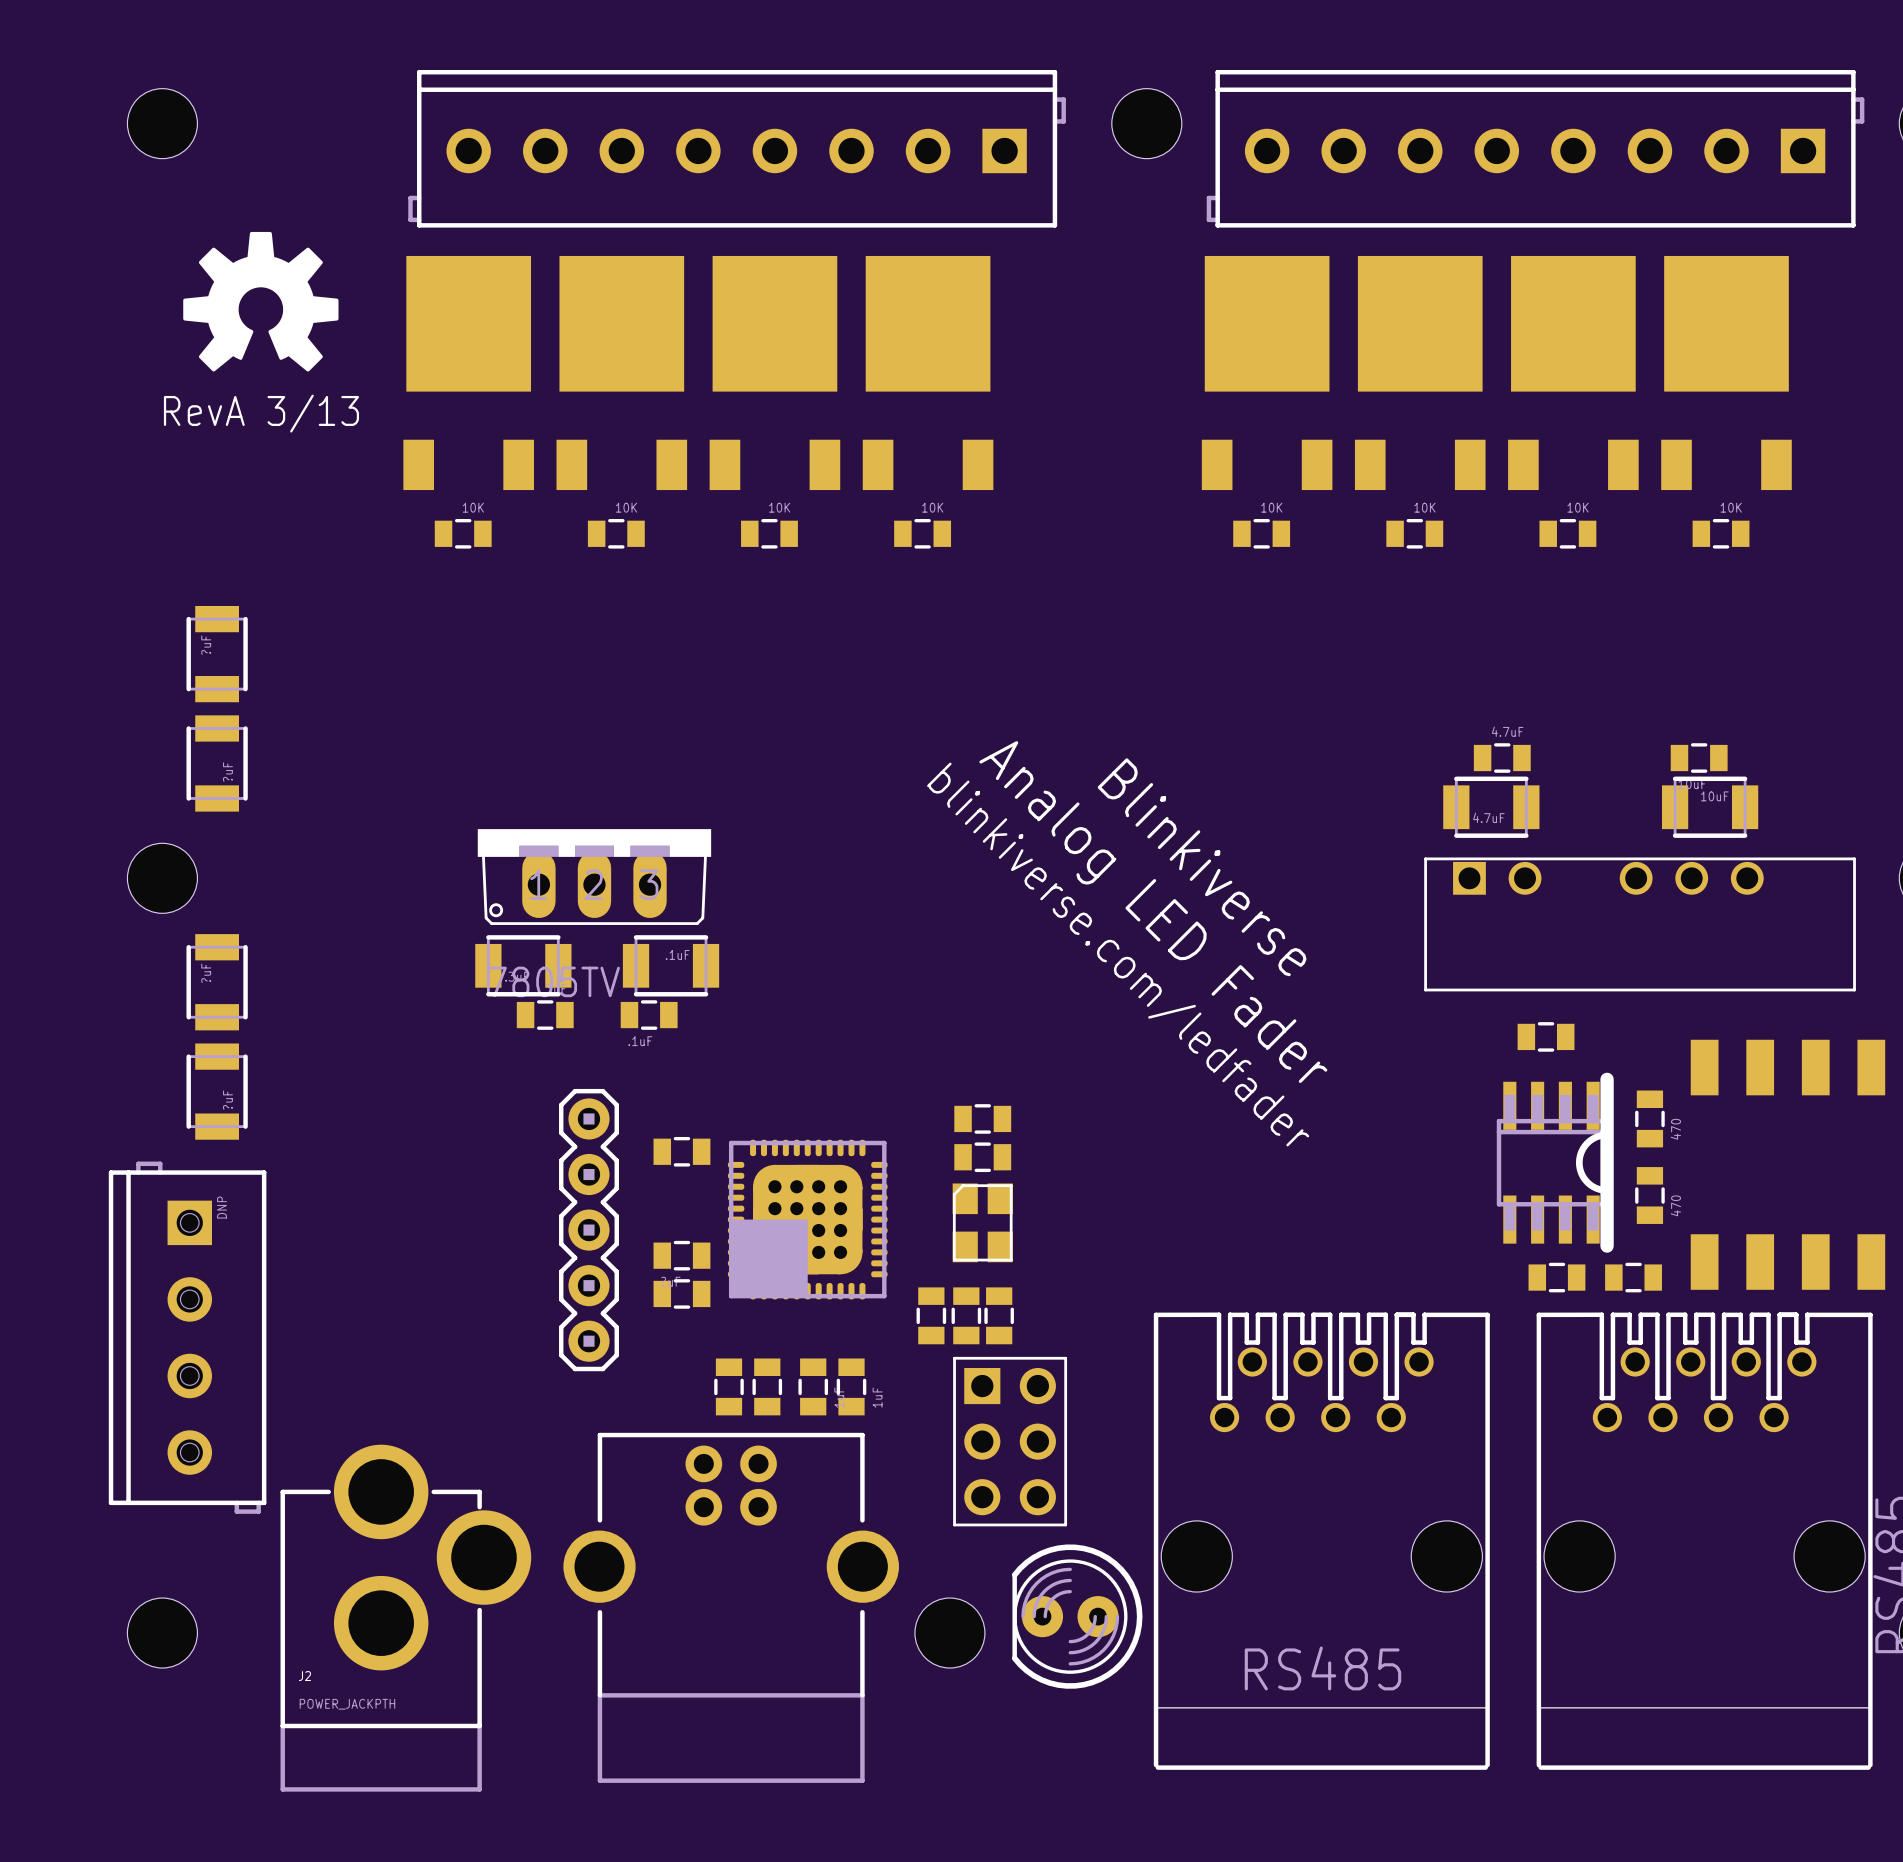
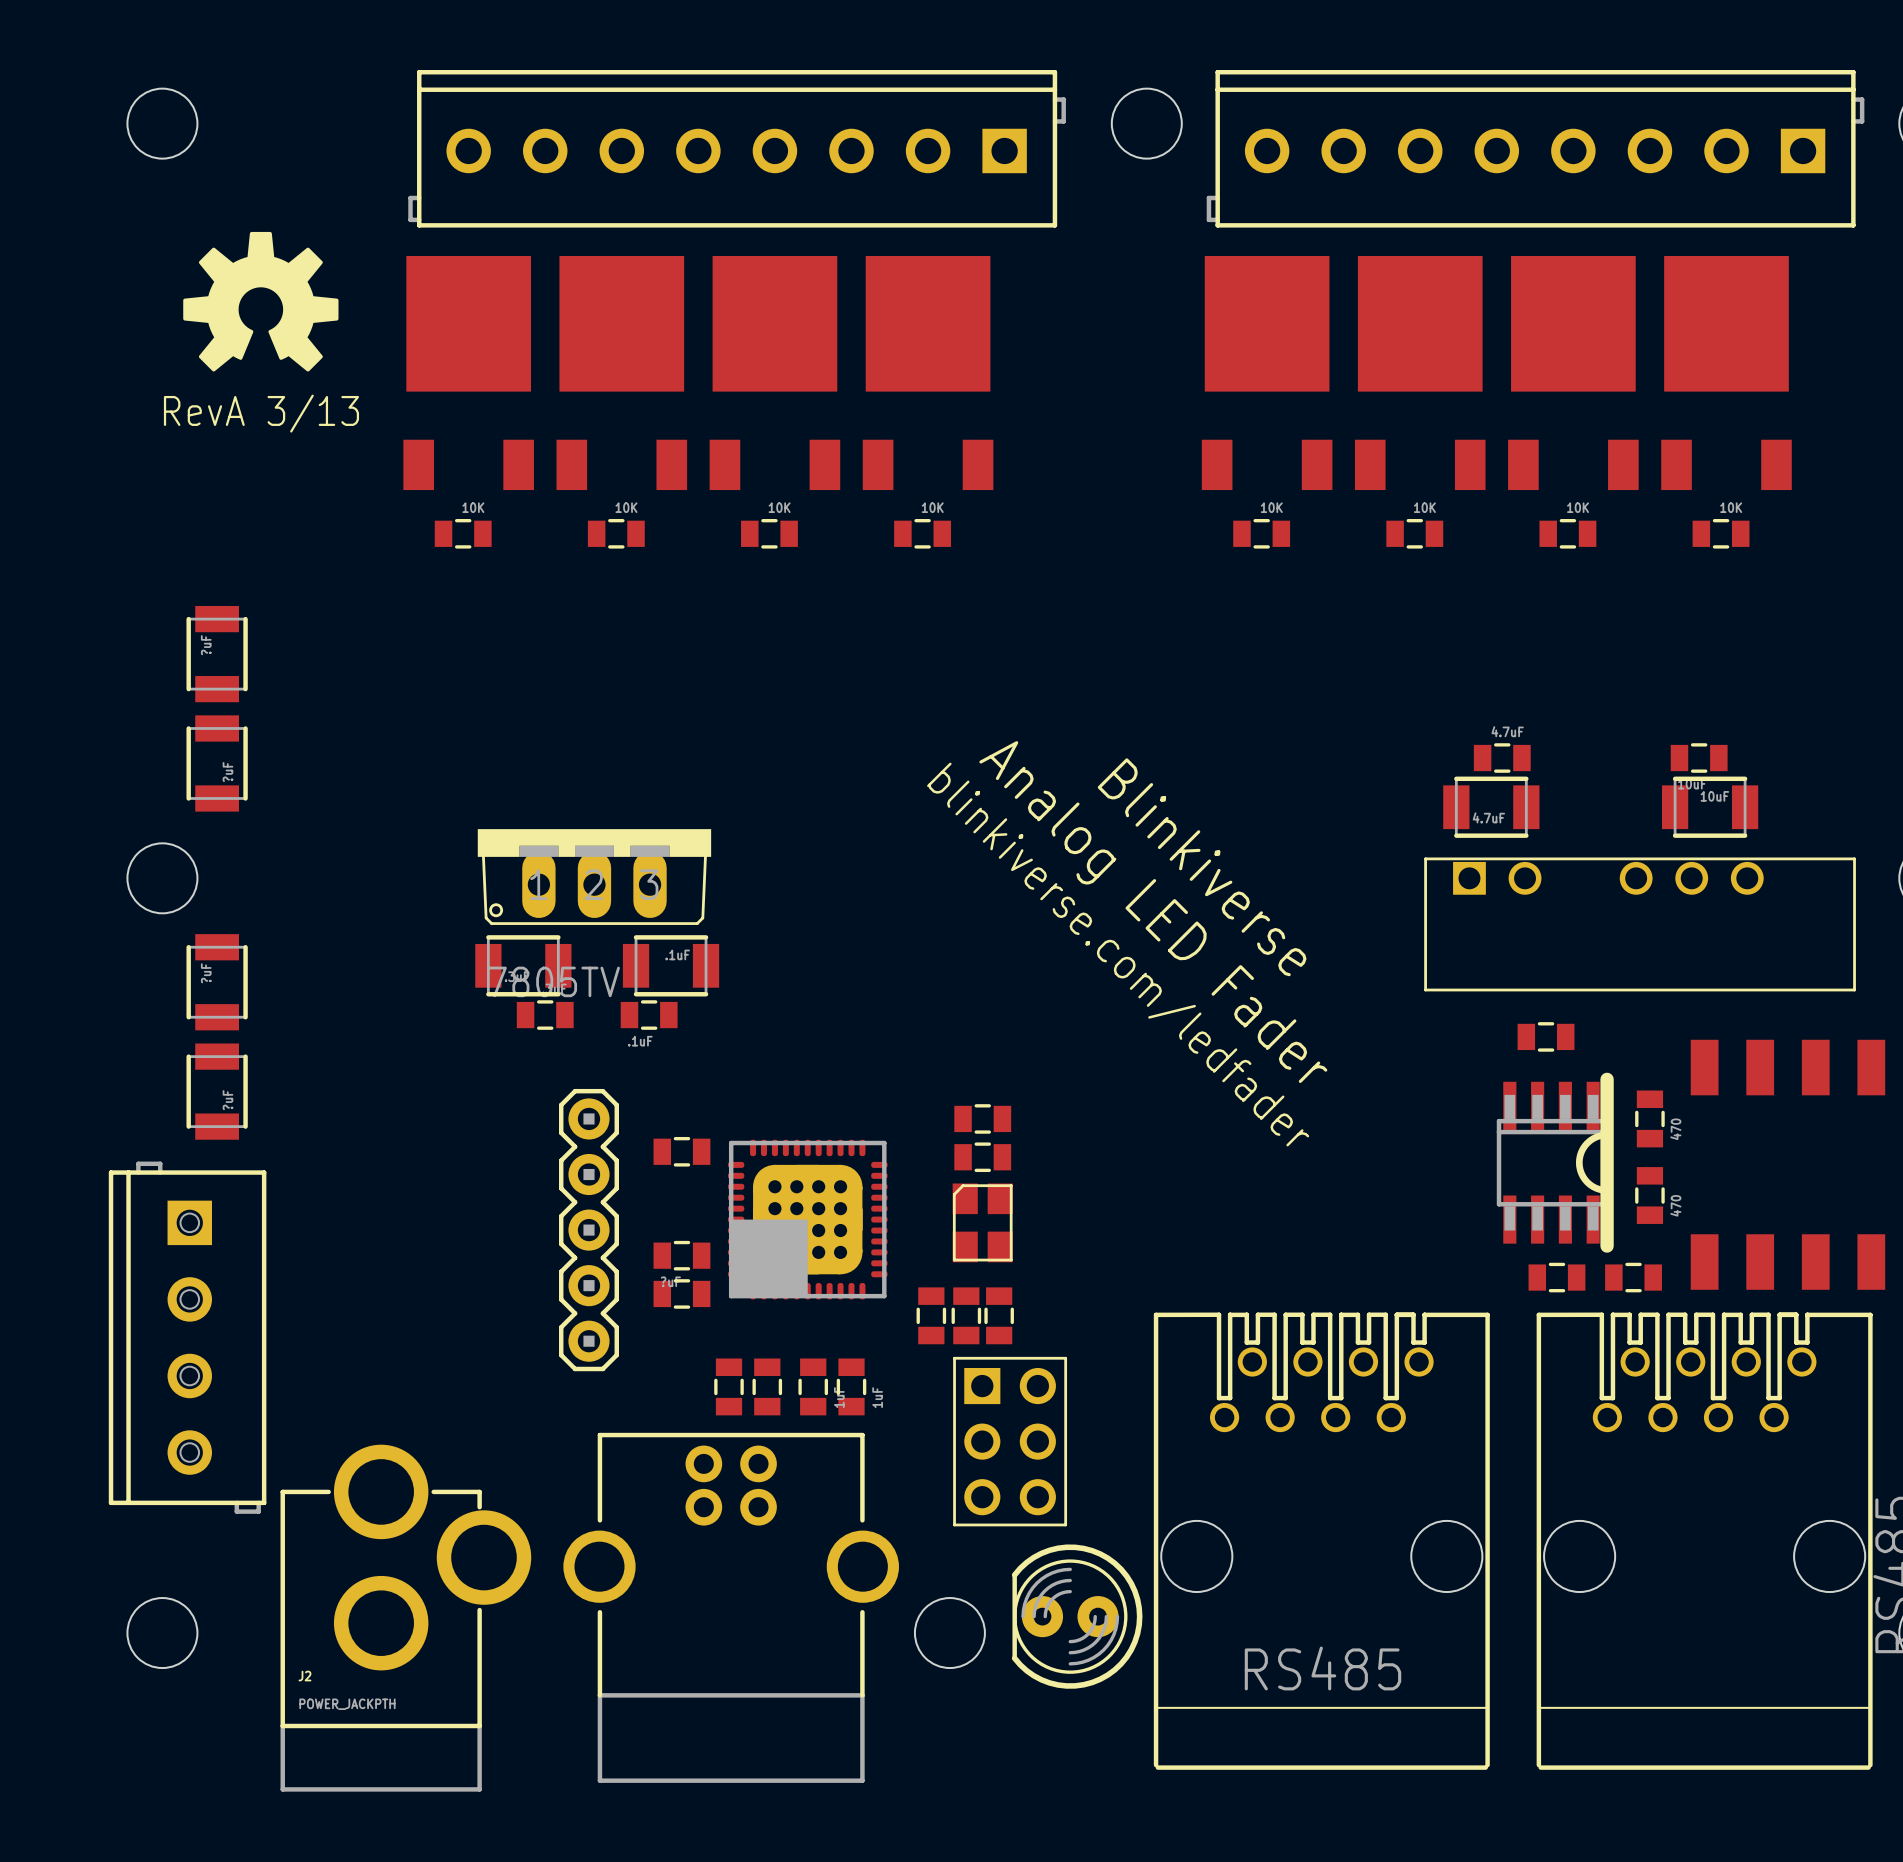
part value: DNP (222, 1207) -> none

